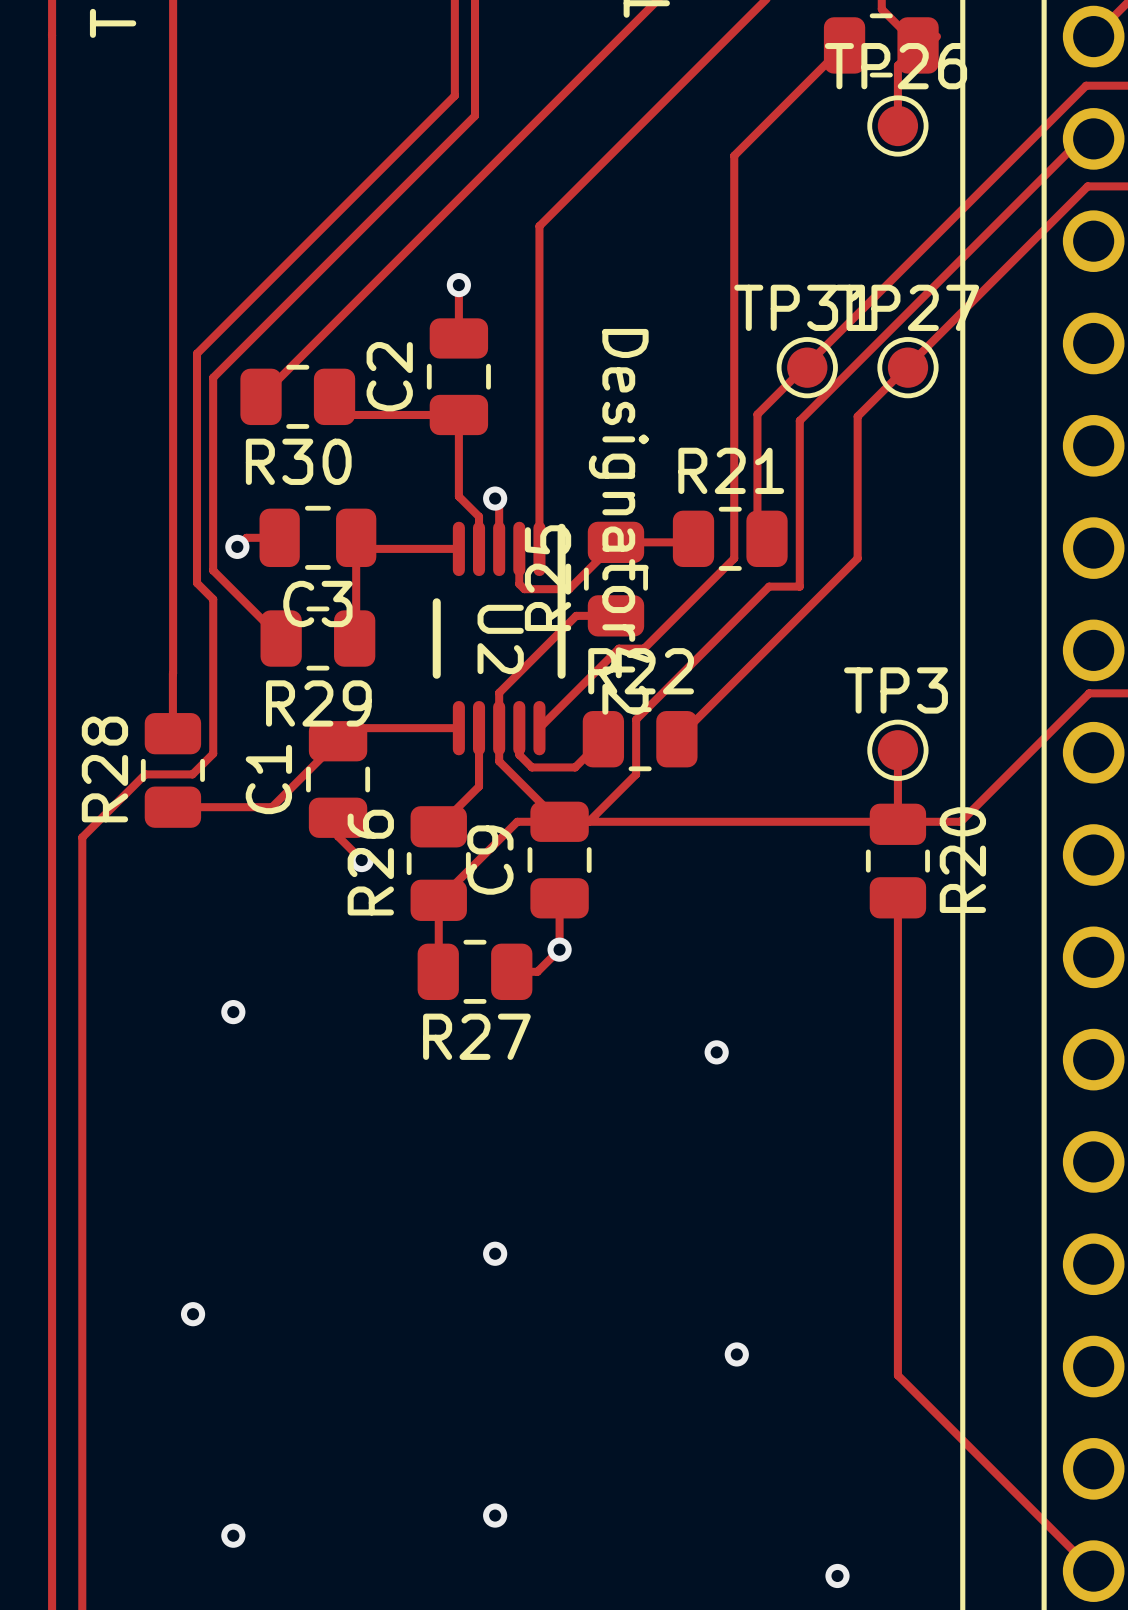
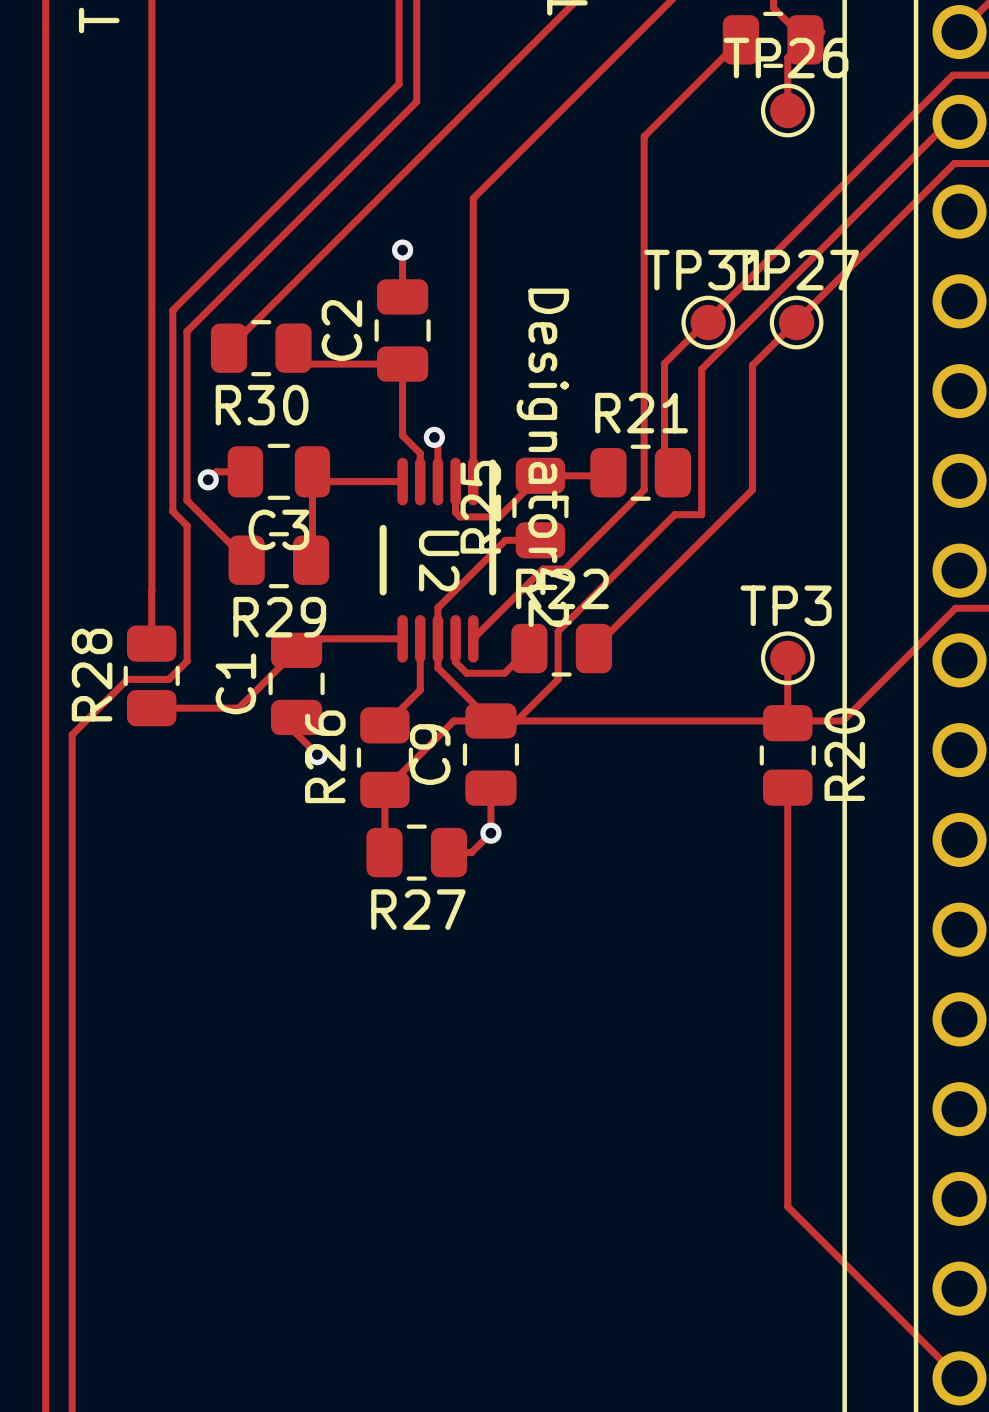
via: (233, 1012) -> none
via: (716, 1052) -> none
via: (495, 1253) -> none
via: (193, 1314) -> none
via: (736, 1354) -> none
via: (495, 1515) -> none
via: (233, 1535) -> none
via: (837, 1575) -> none

